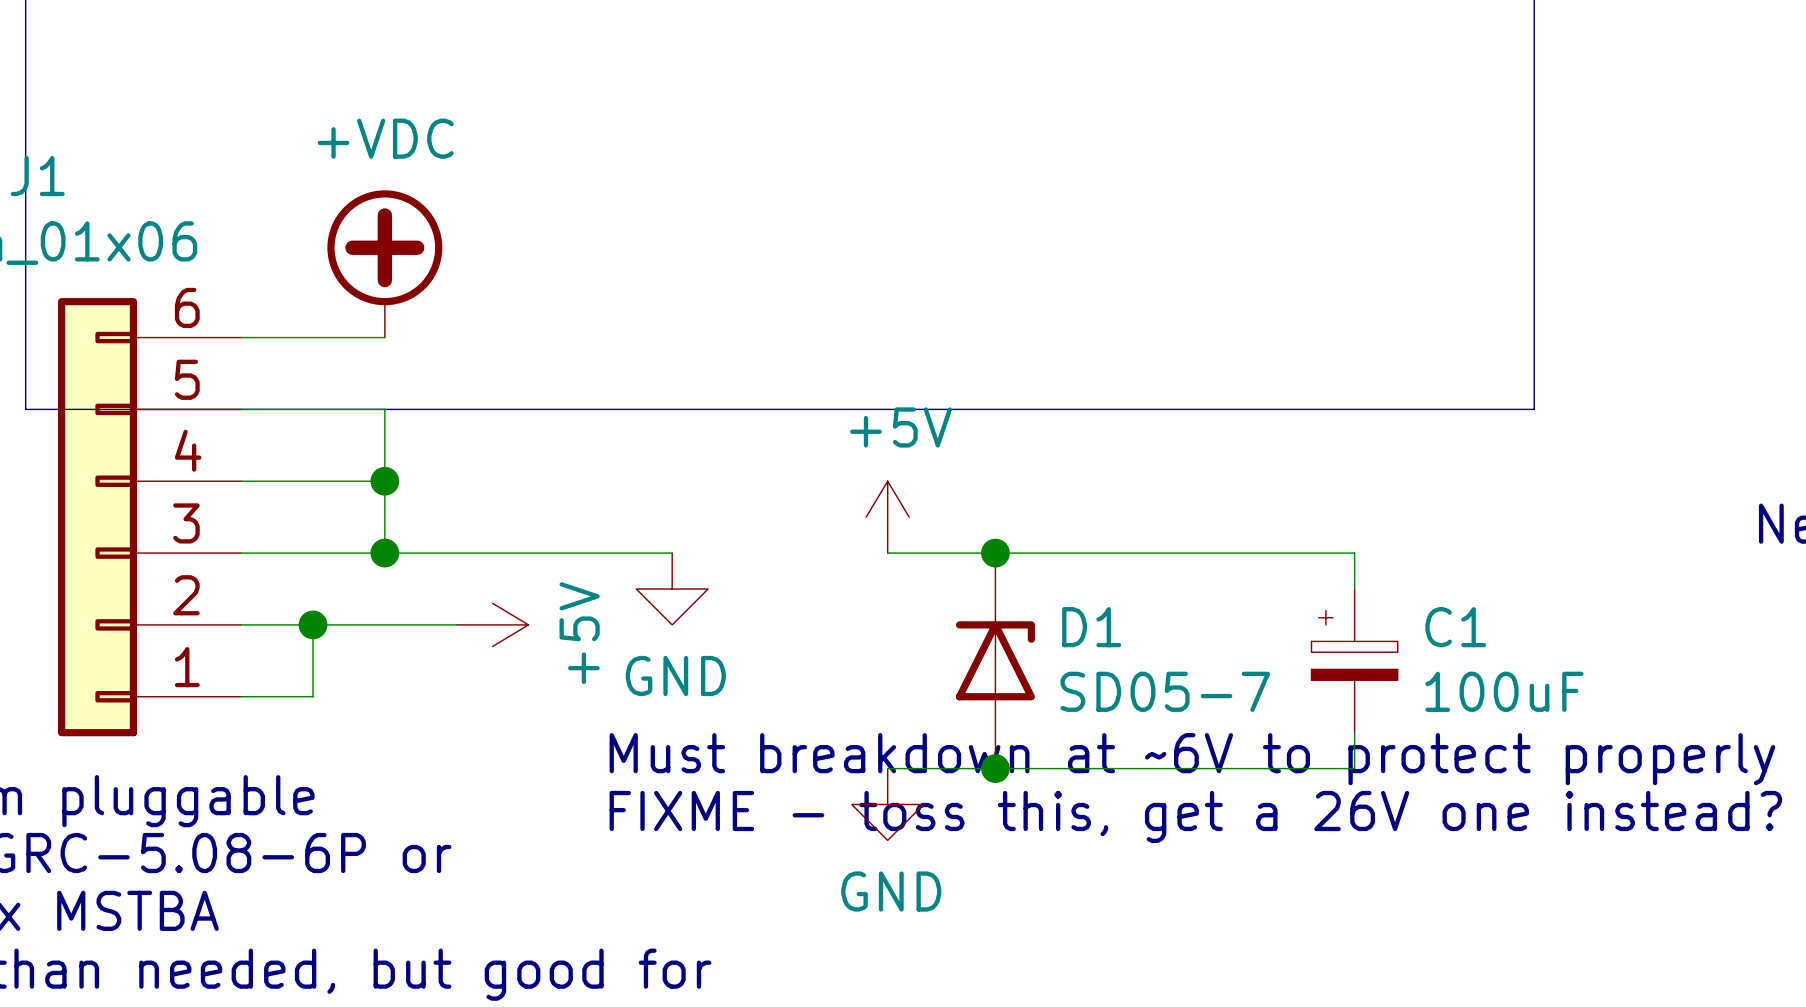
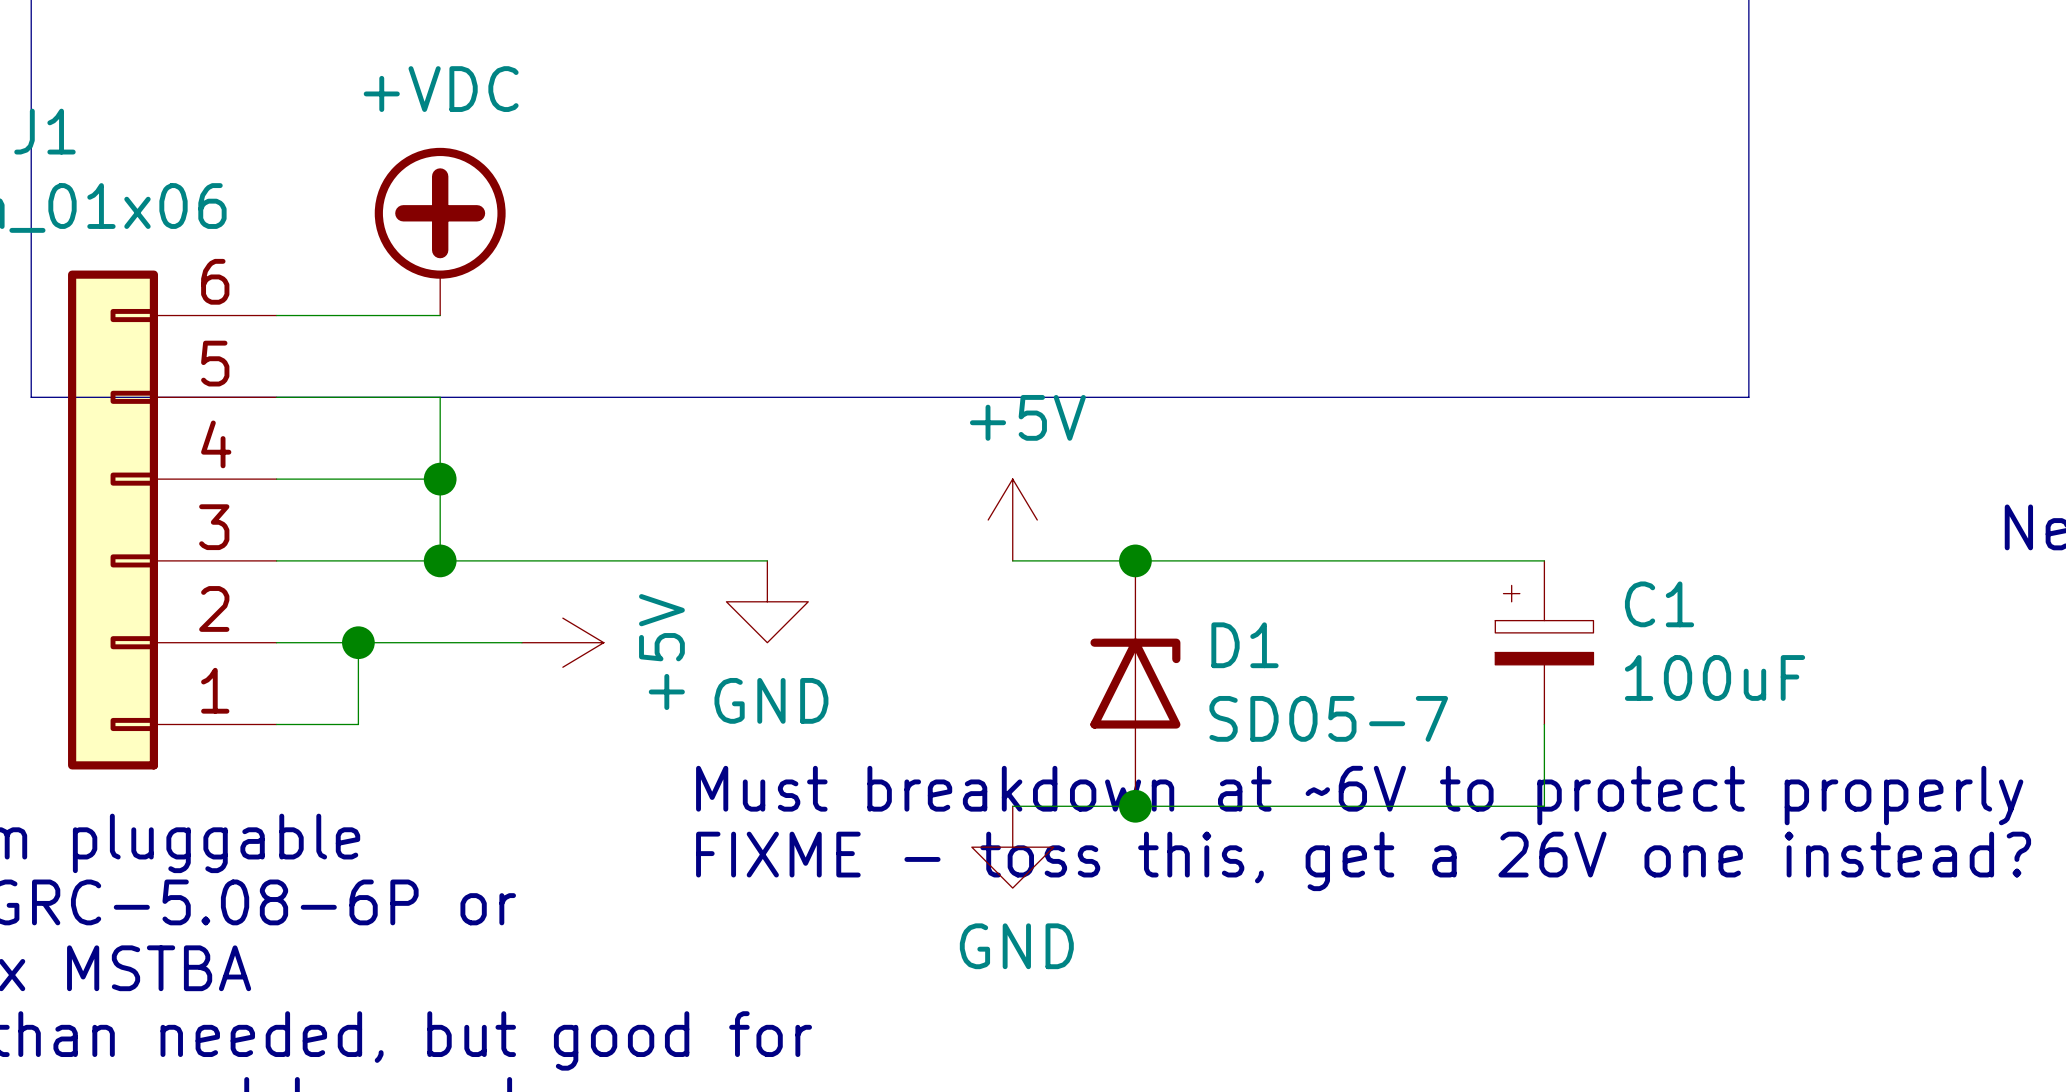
C1 position: (1354, 660) -> (1544, 642)

